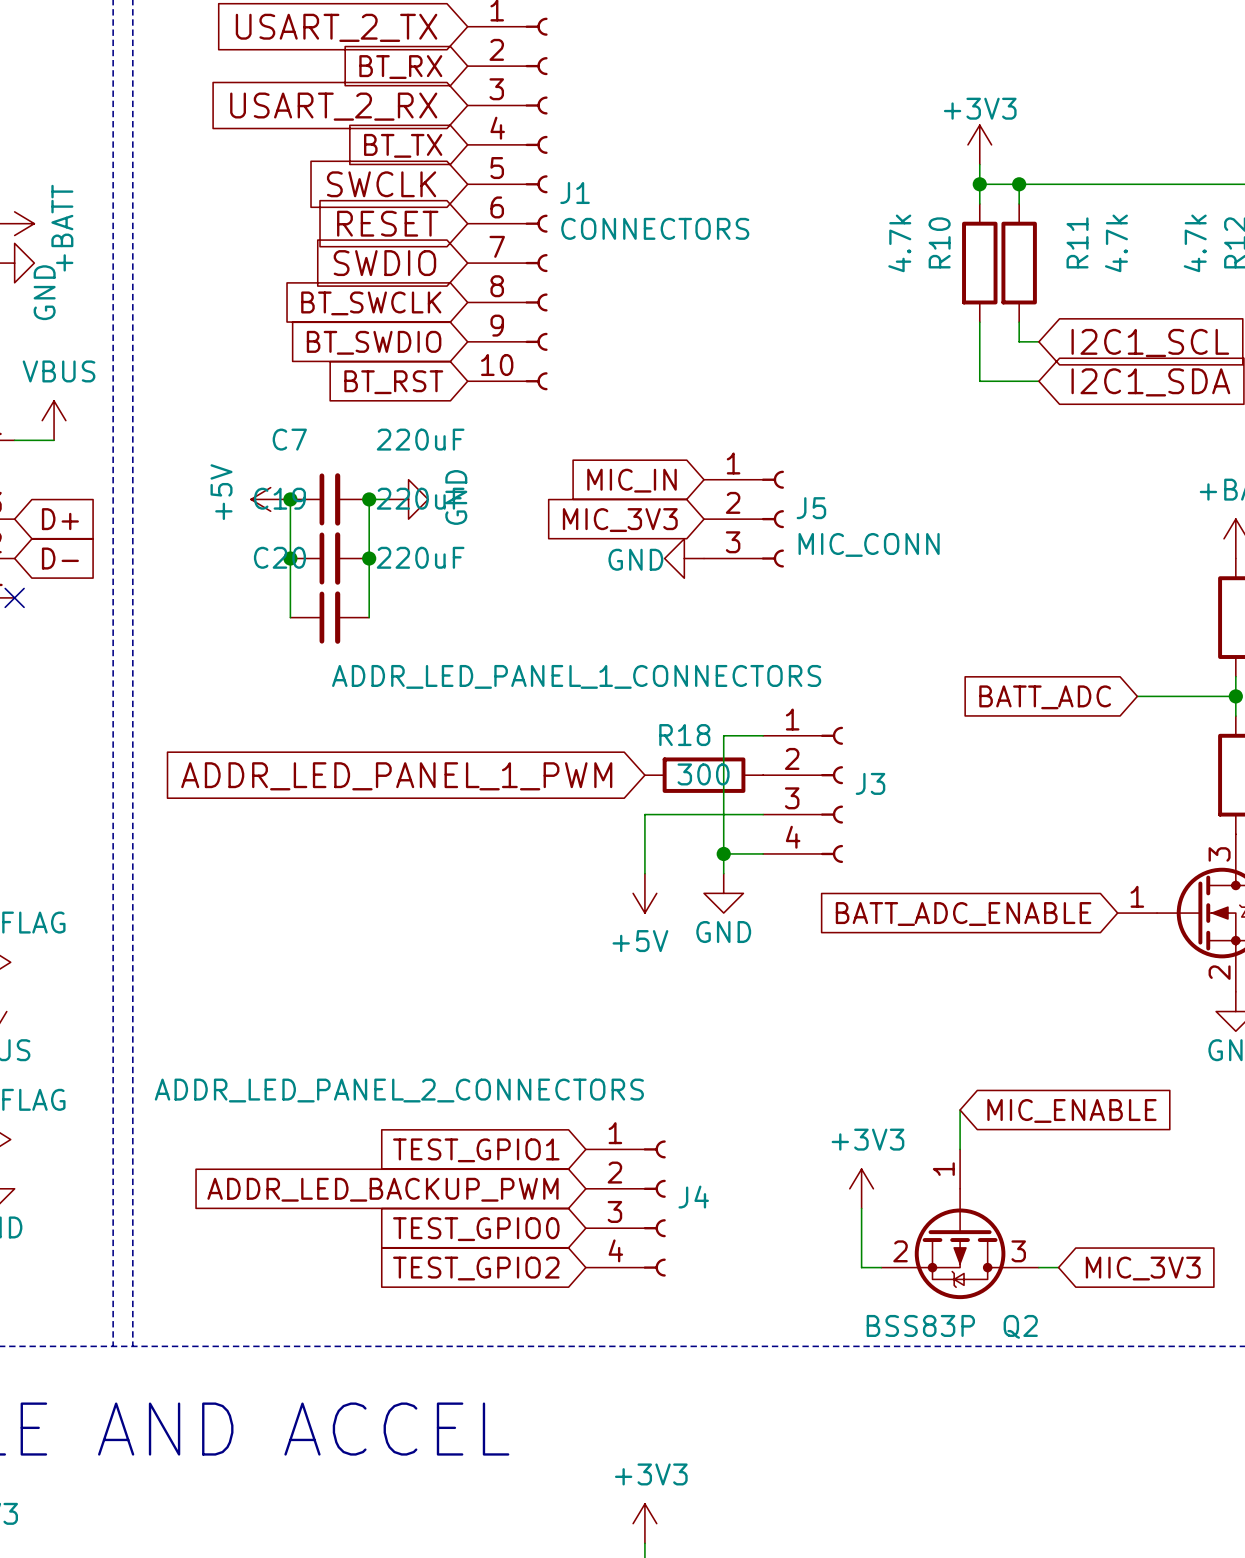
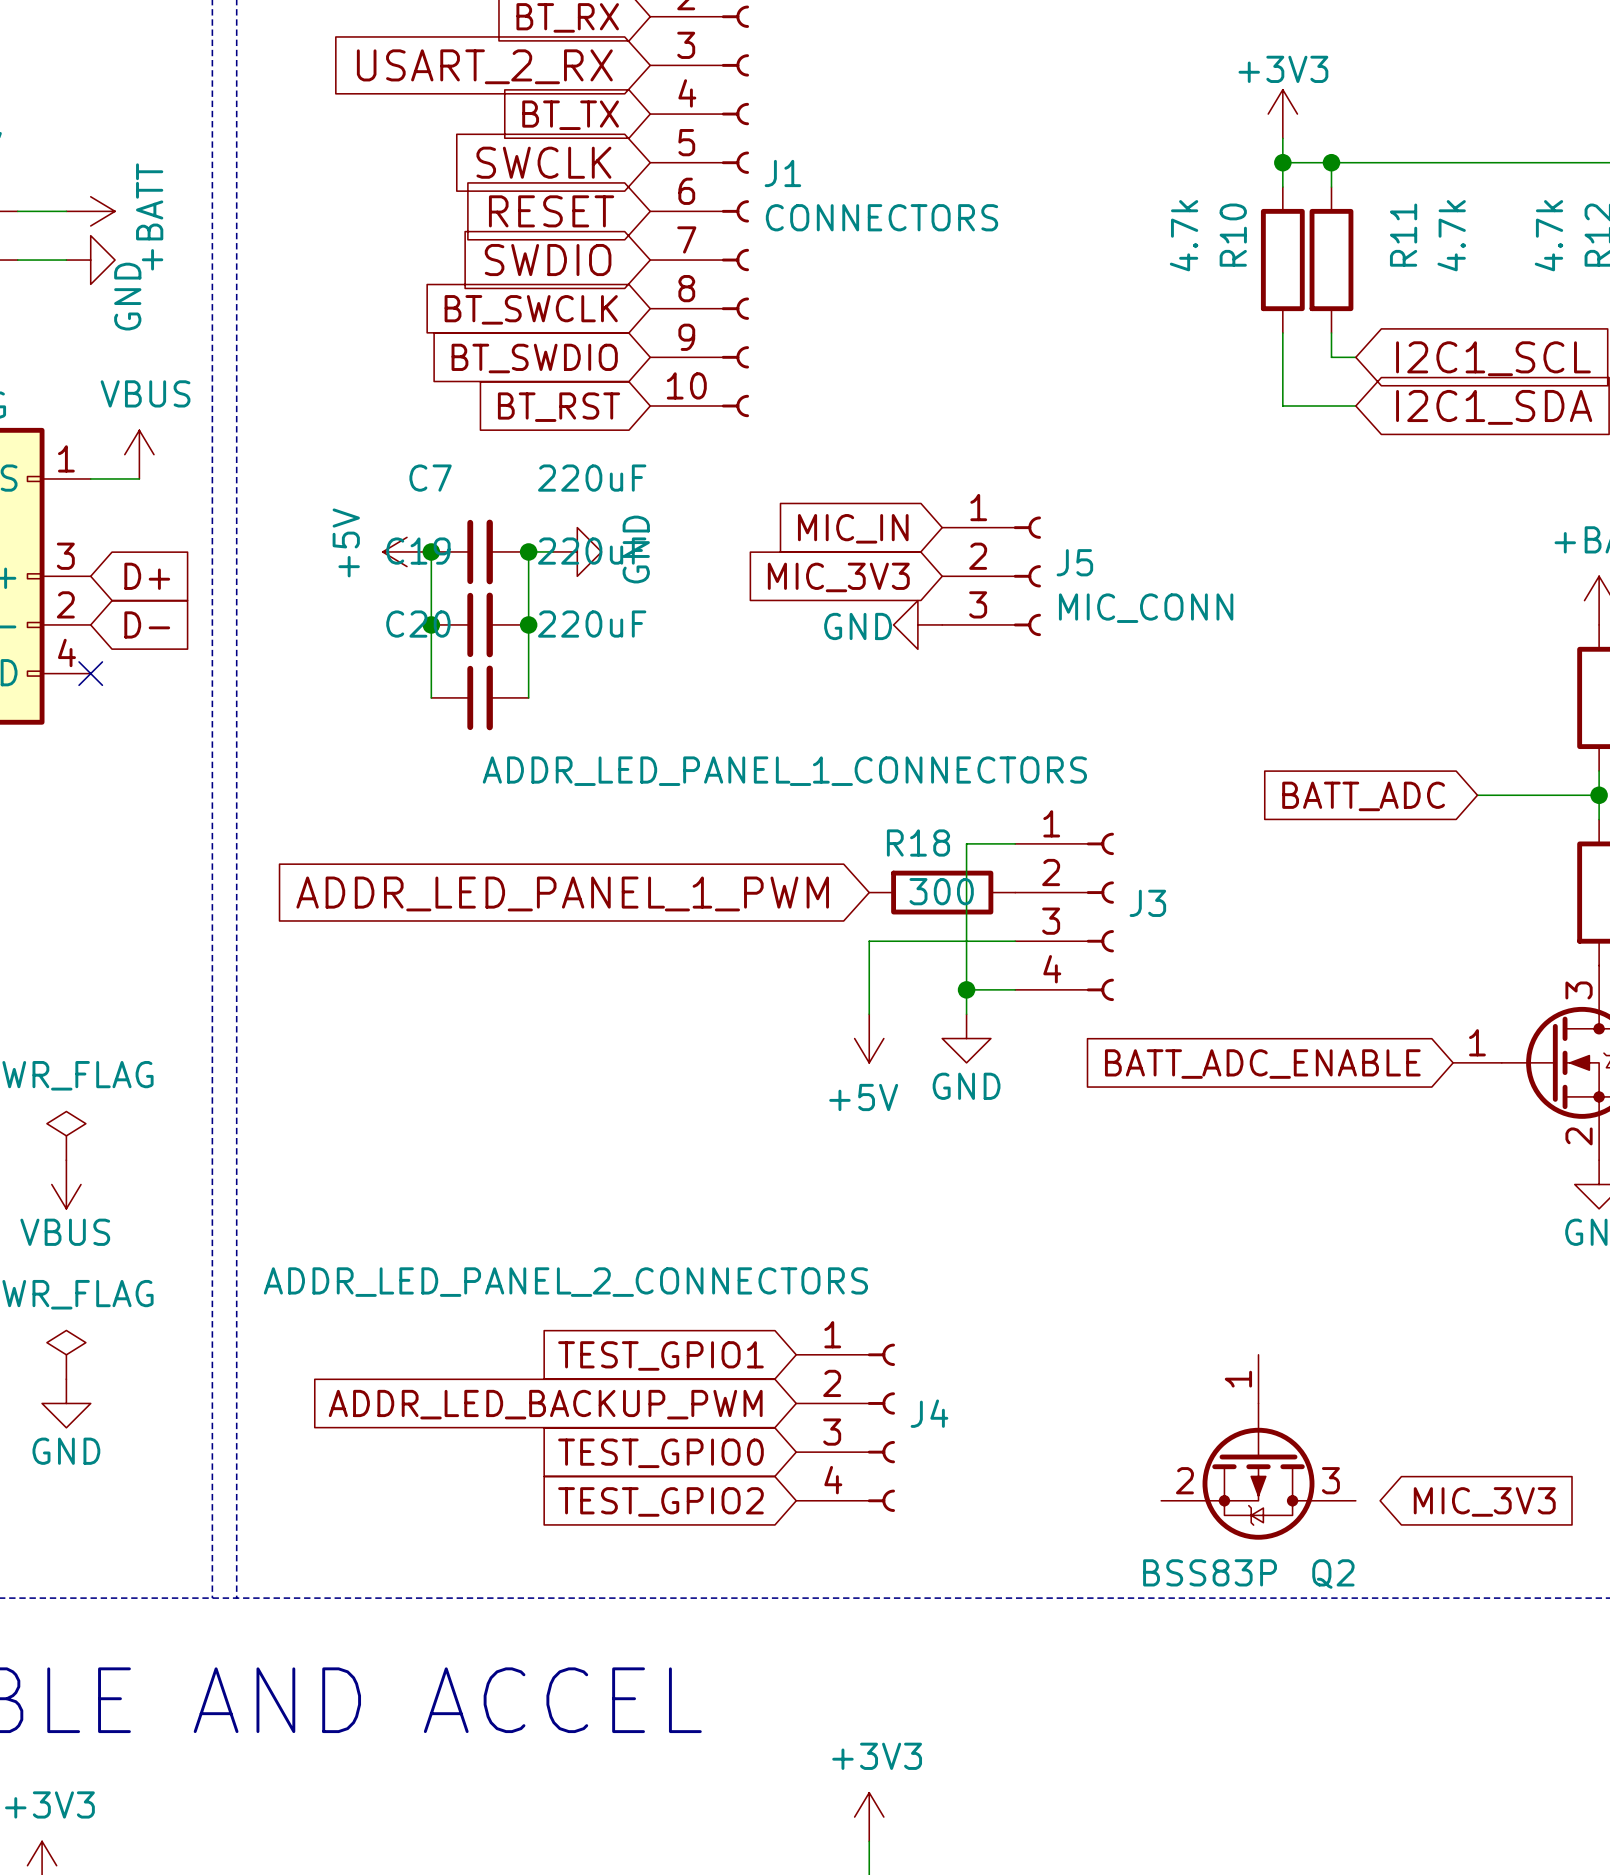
wire: (960, 1110) (960, 1149) -> none
global label: MIC_ENABLE (1071, 1110) -> none
power symbol: +3V3 (861, 1188) -> none
wire: (861, 1208) (861, 1267) (881, 1267) -> none
wire: (1038, 1267) (1058, 1267) -> none

